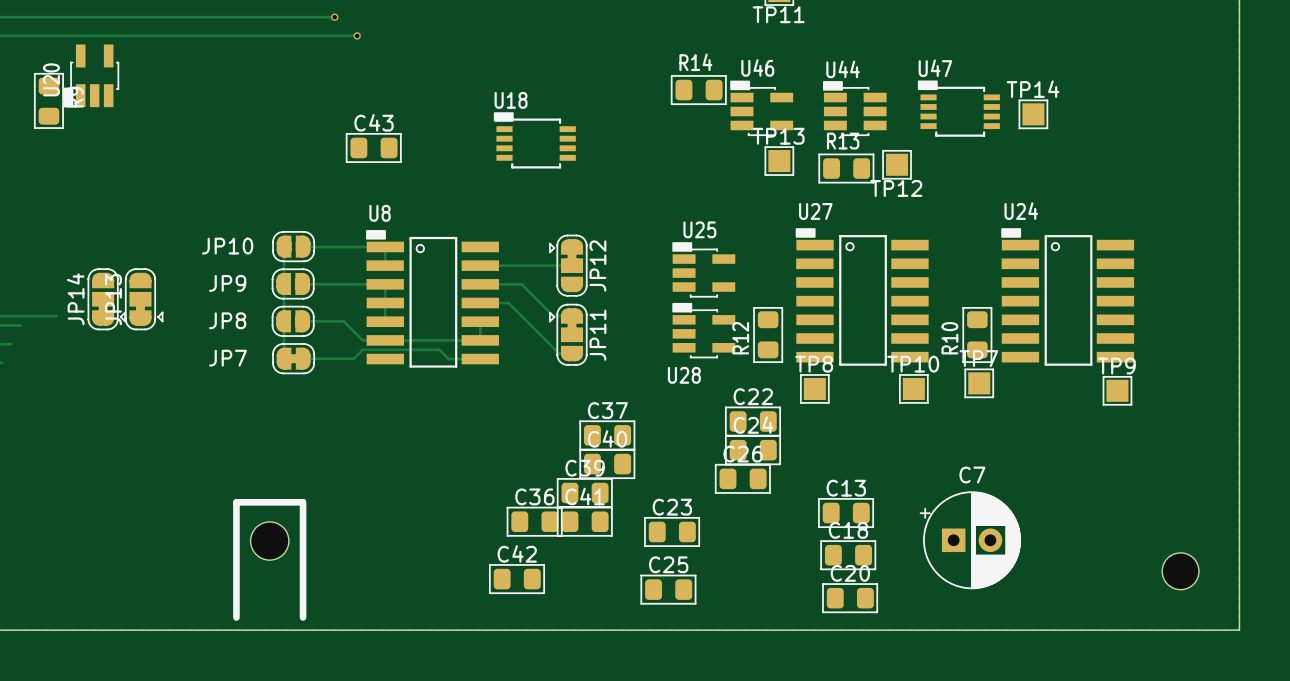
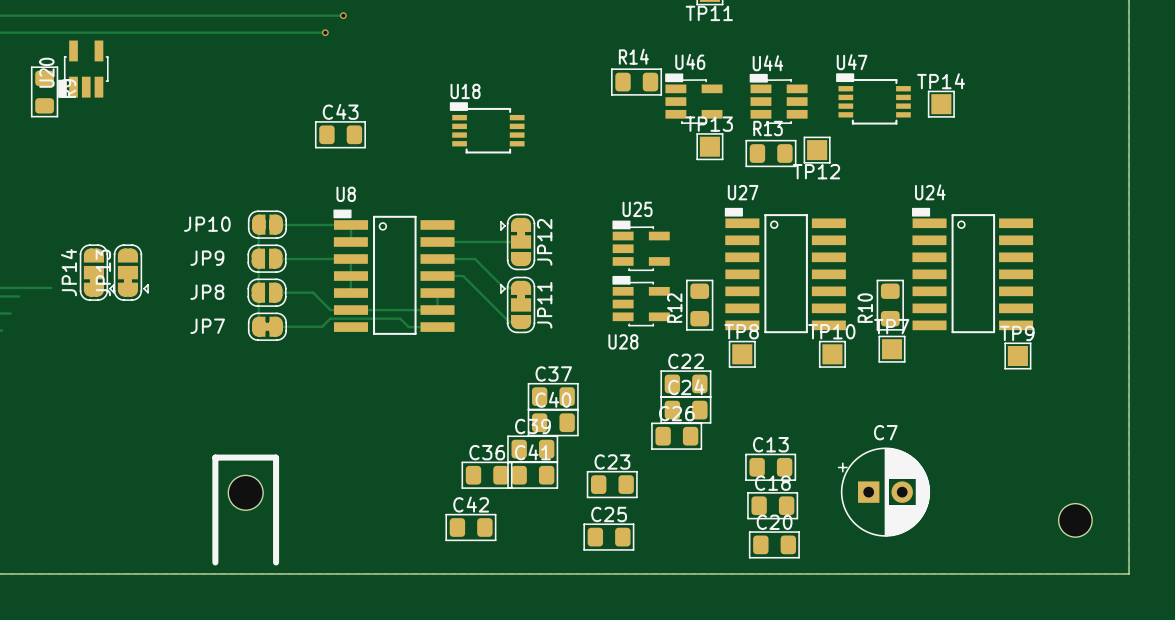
track: none -> (304, 15) (343, 15)
via position: (334, 17) -> (343, 15)

